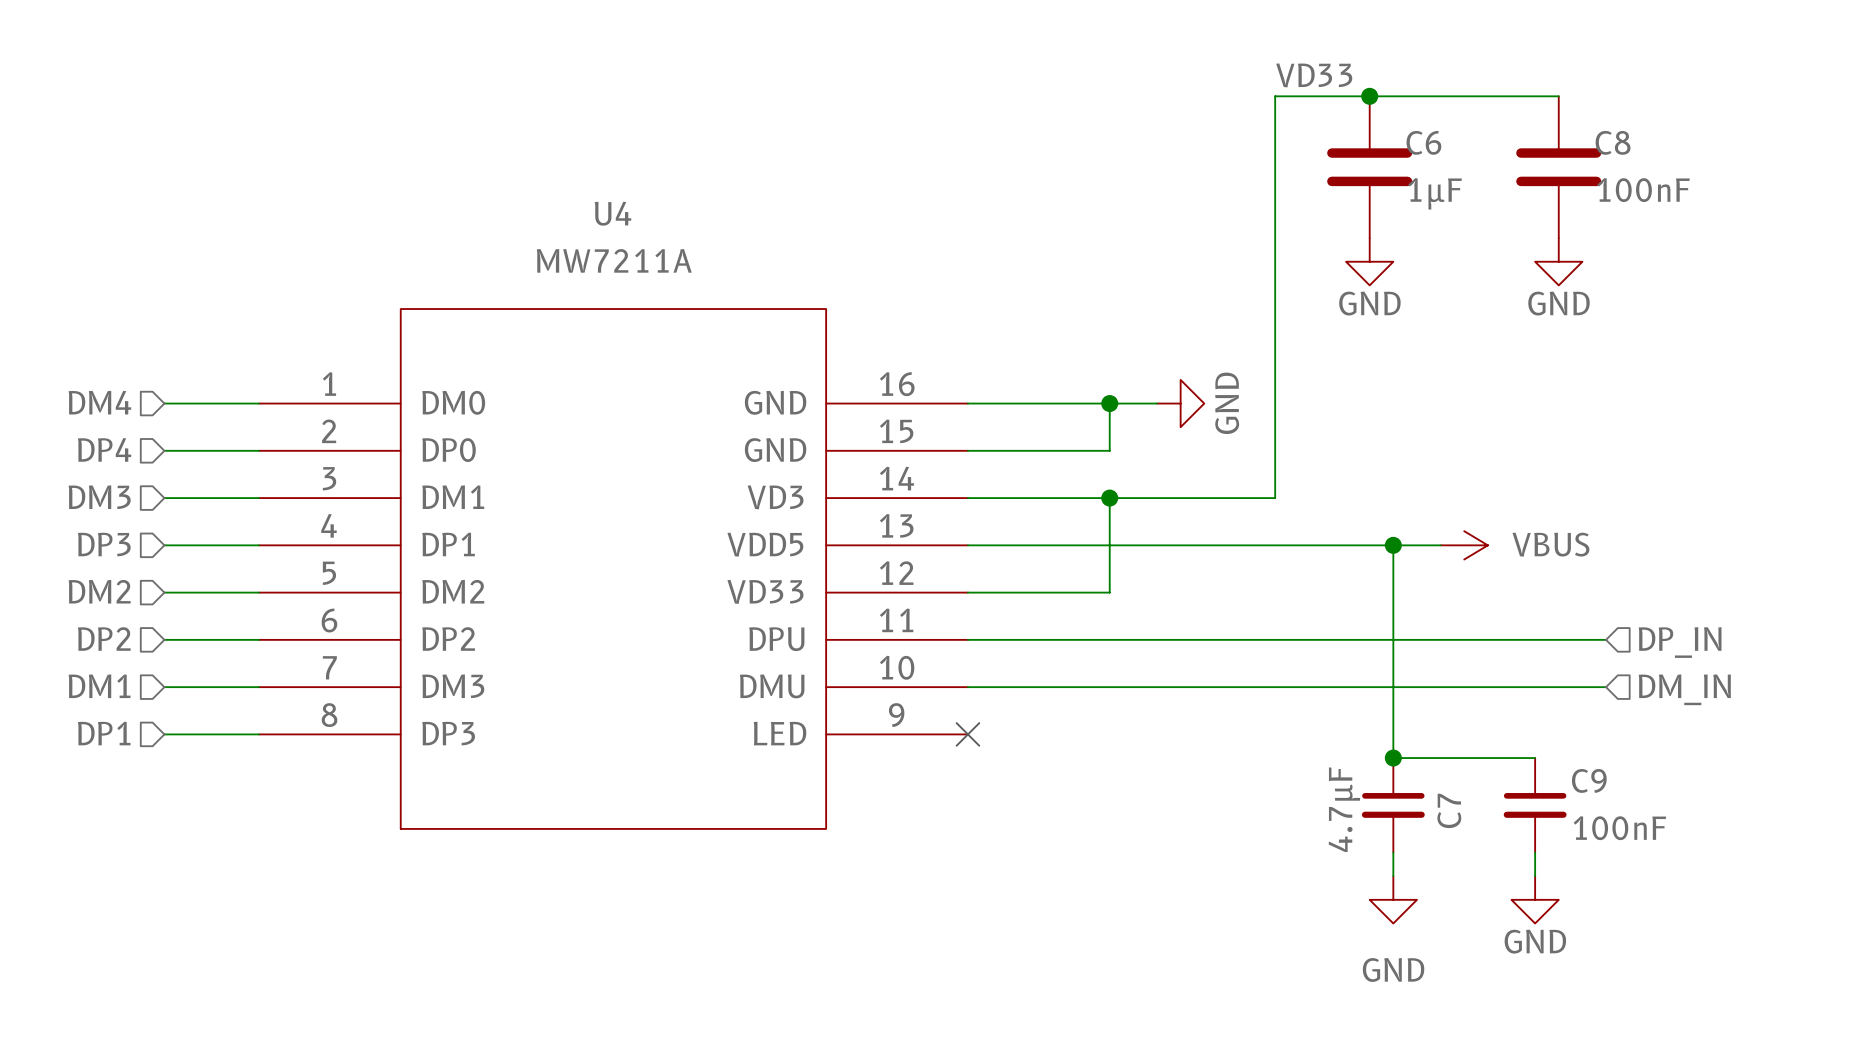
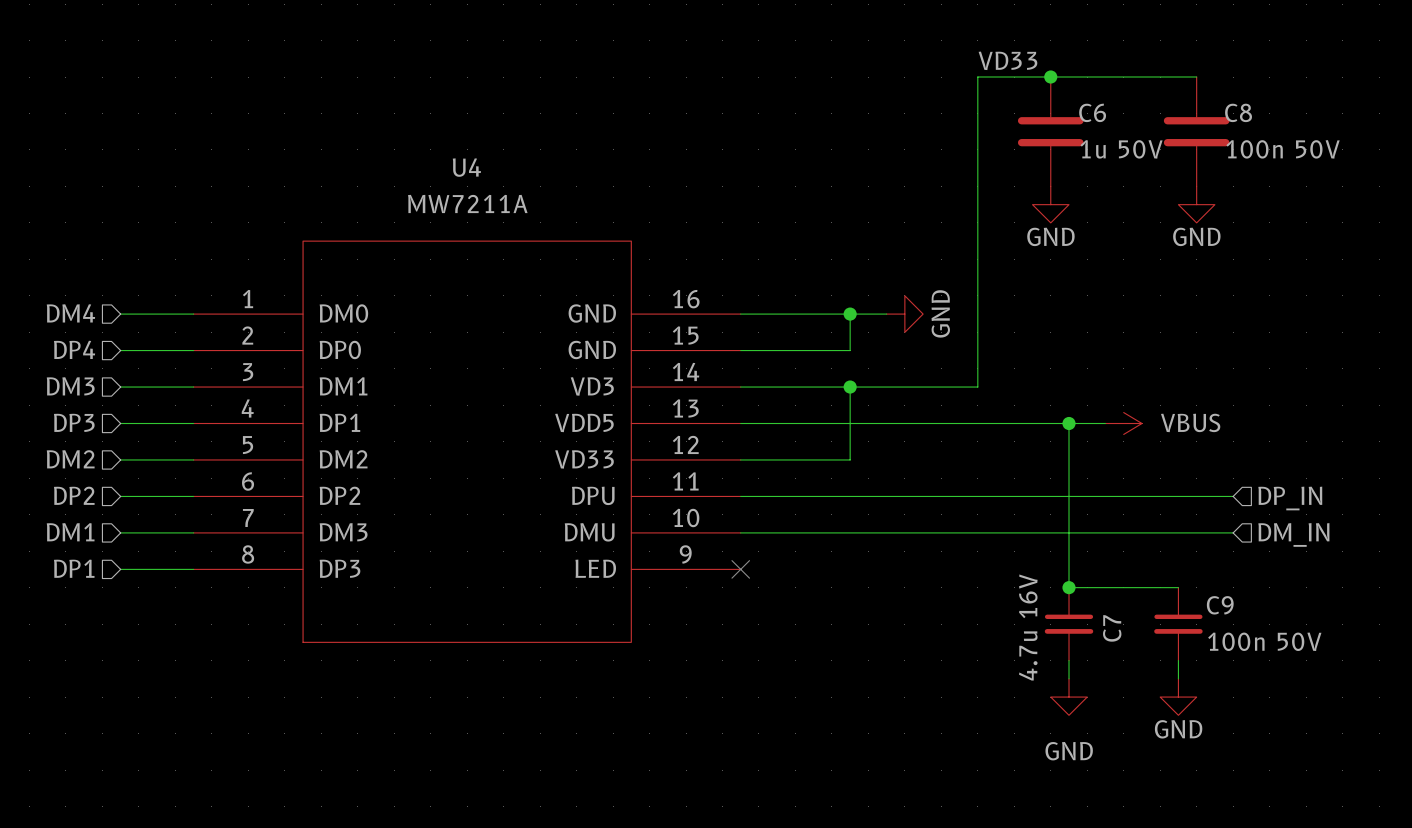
C8 value: 100nF (1643, 190) -> 100n 50V (1283, 149)
C6 value: 1µF (1435, 193) -> 1u 50V (1121, 149)
C7 value: 4.7µF (1344, 809) -> 4.7u 16V (1028, 627)
C9 value: 100nF (1619, 828) -> 100n 50V (1264, 641)

